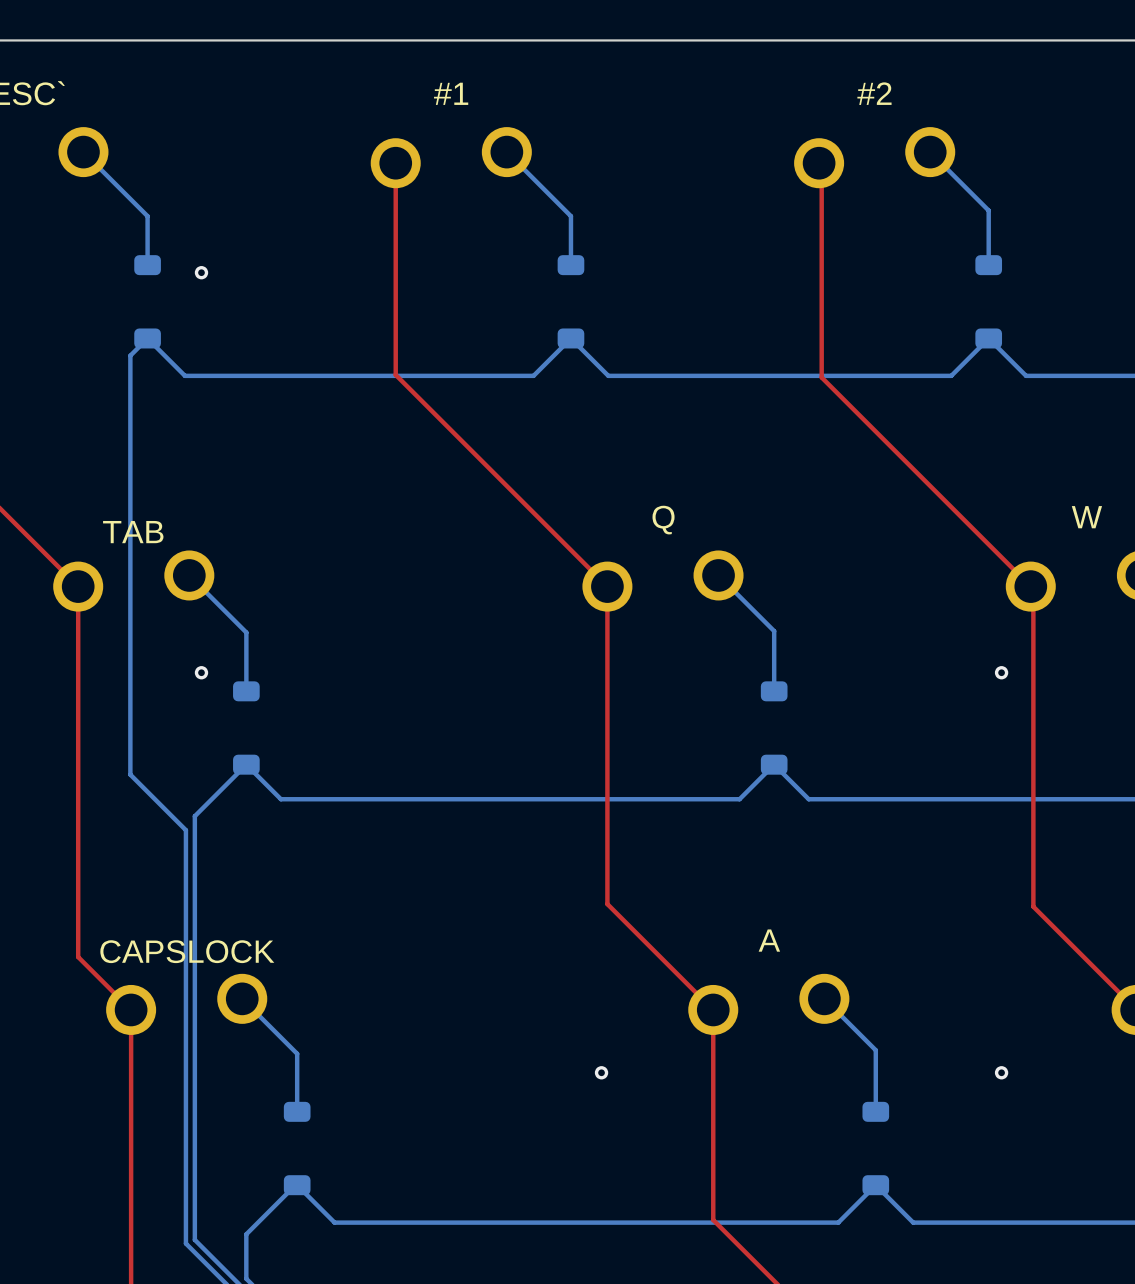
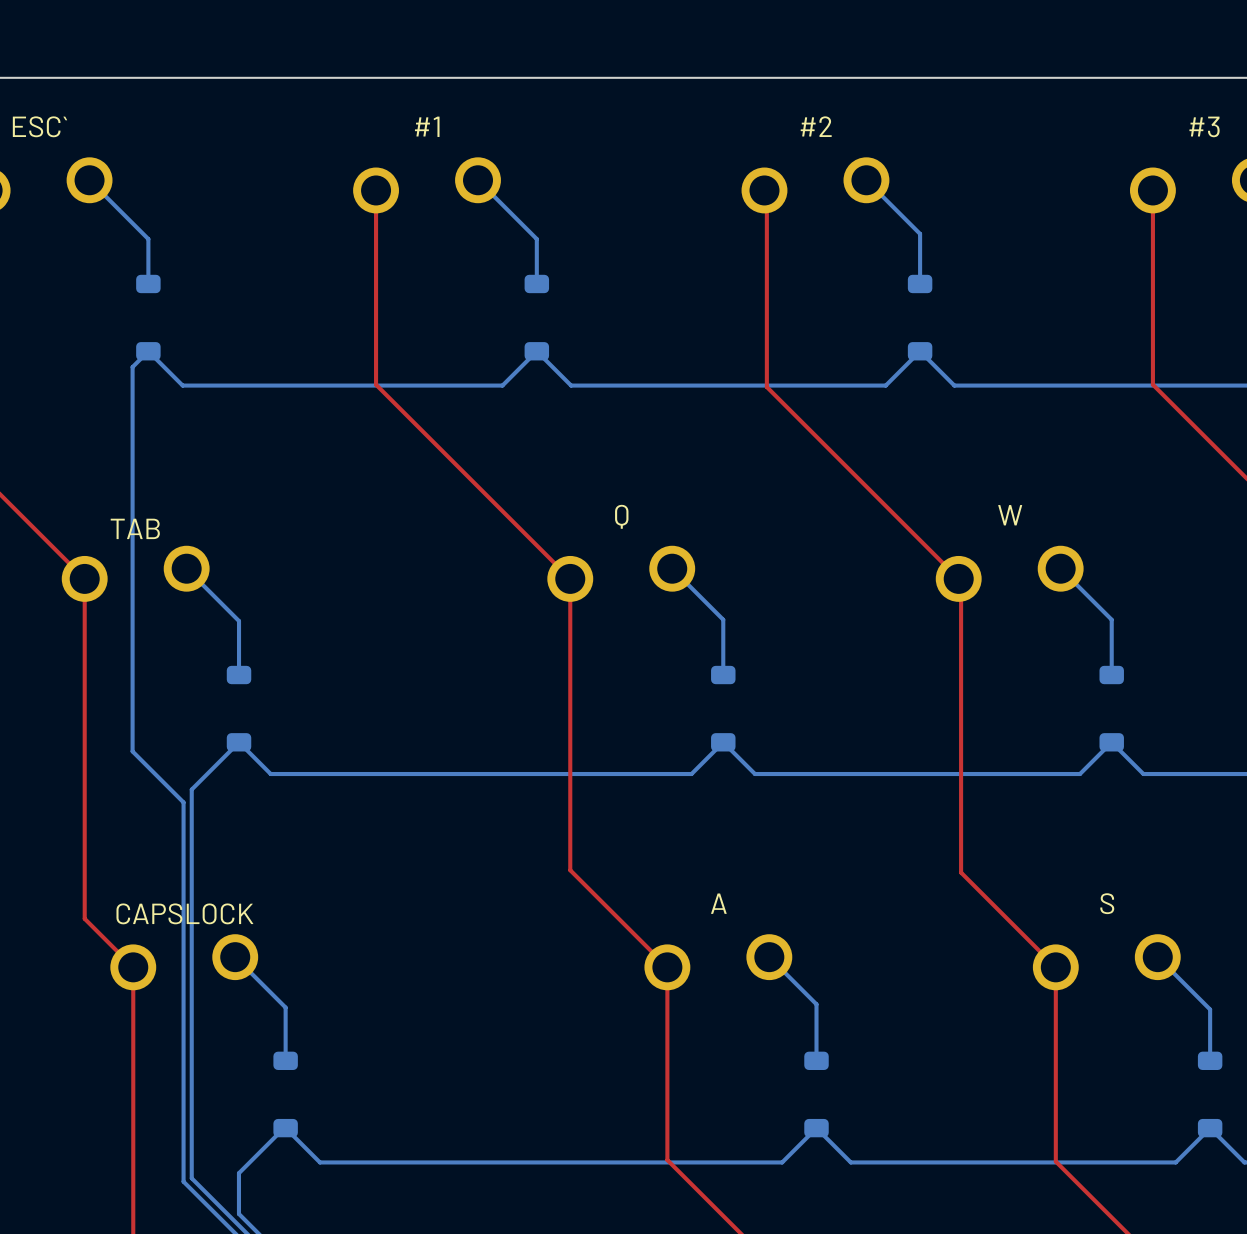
via: (201, 272) -> none
via: (201, 672) -> none
via: (1001, 672) -> none
via: (601, 1072) -> none
via: (1001, 1072) -> none

